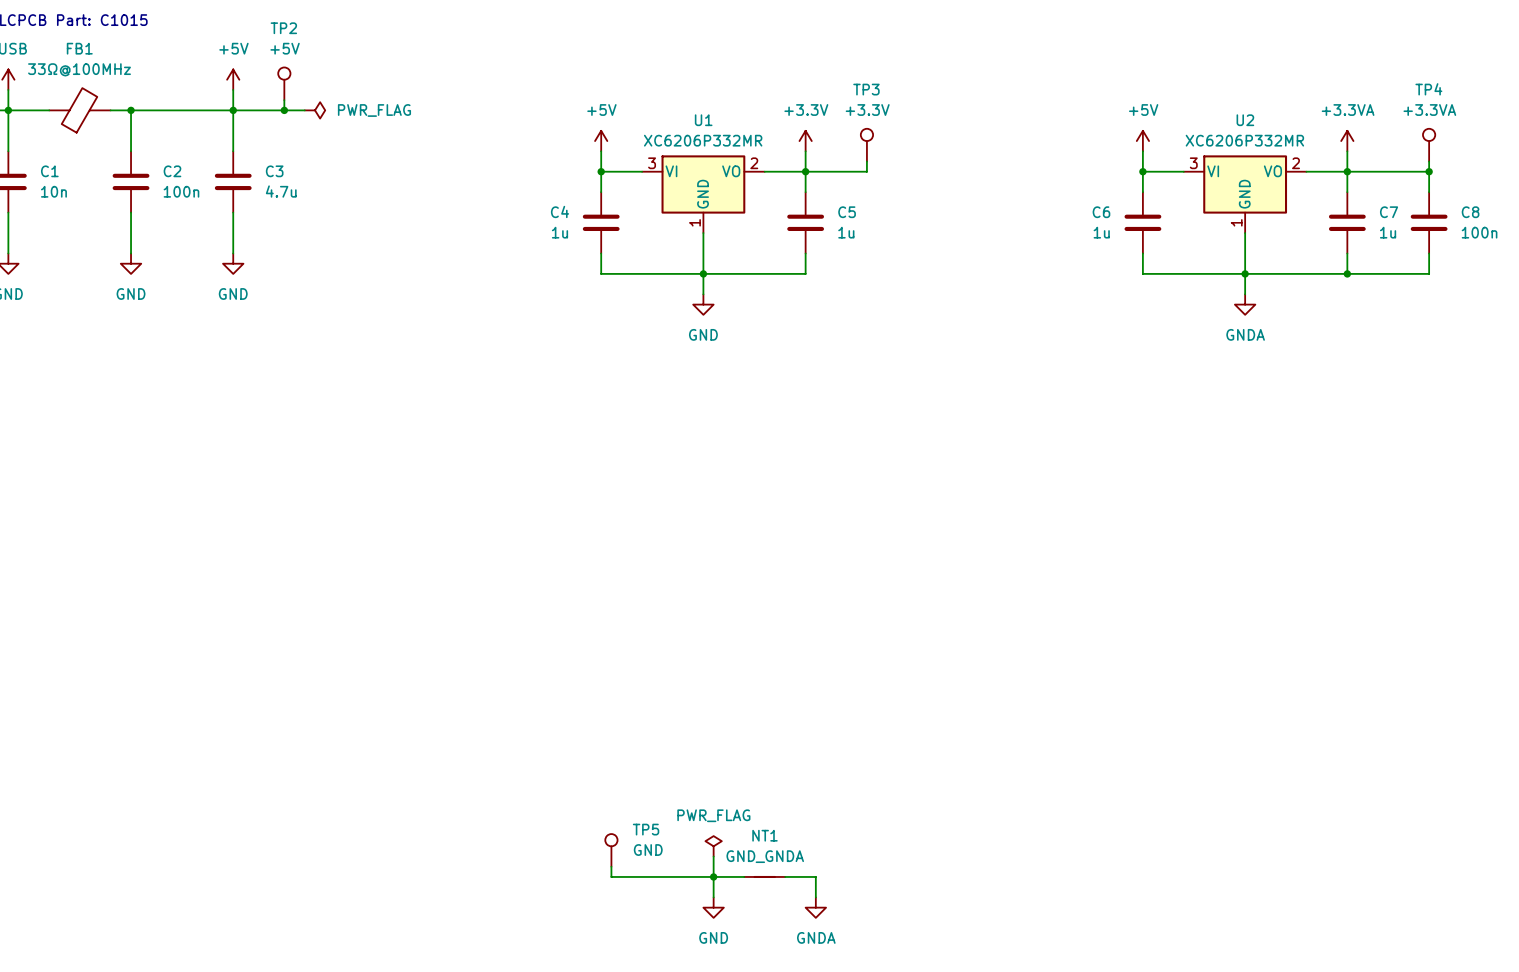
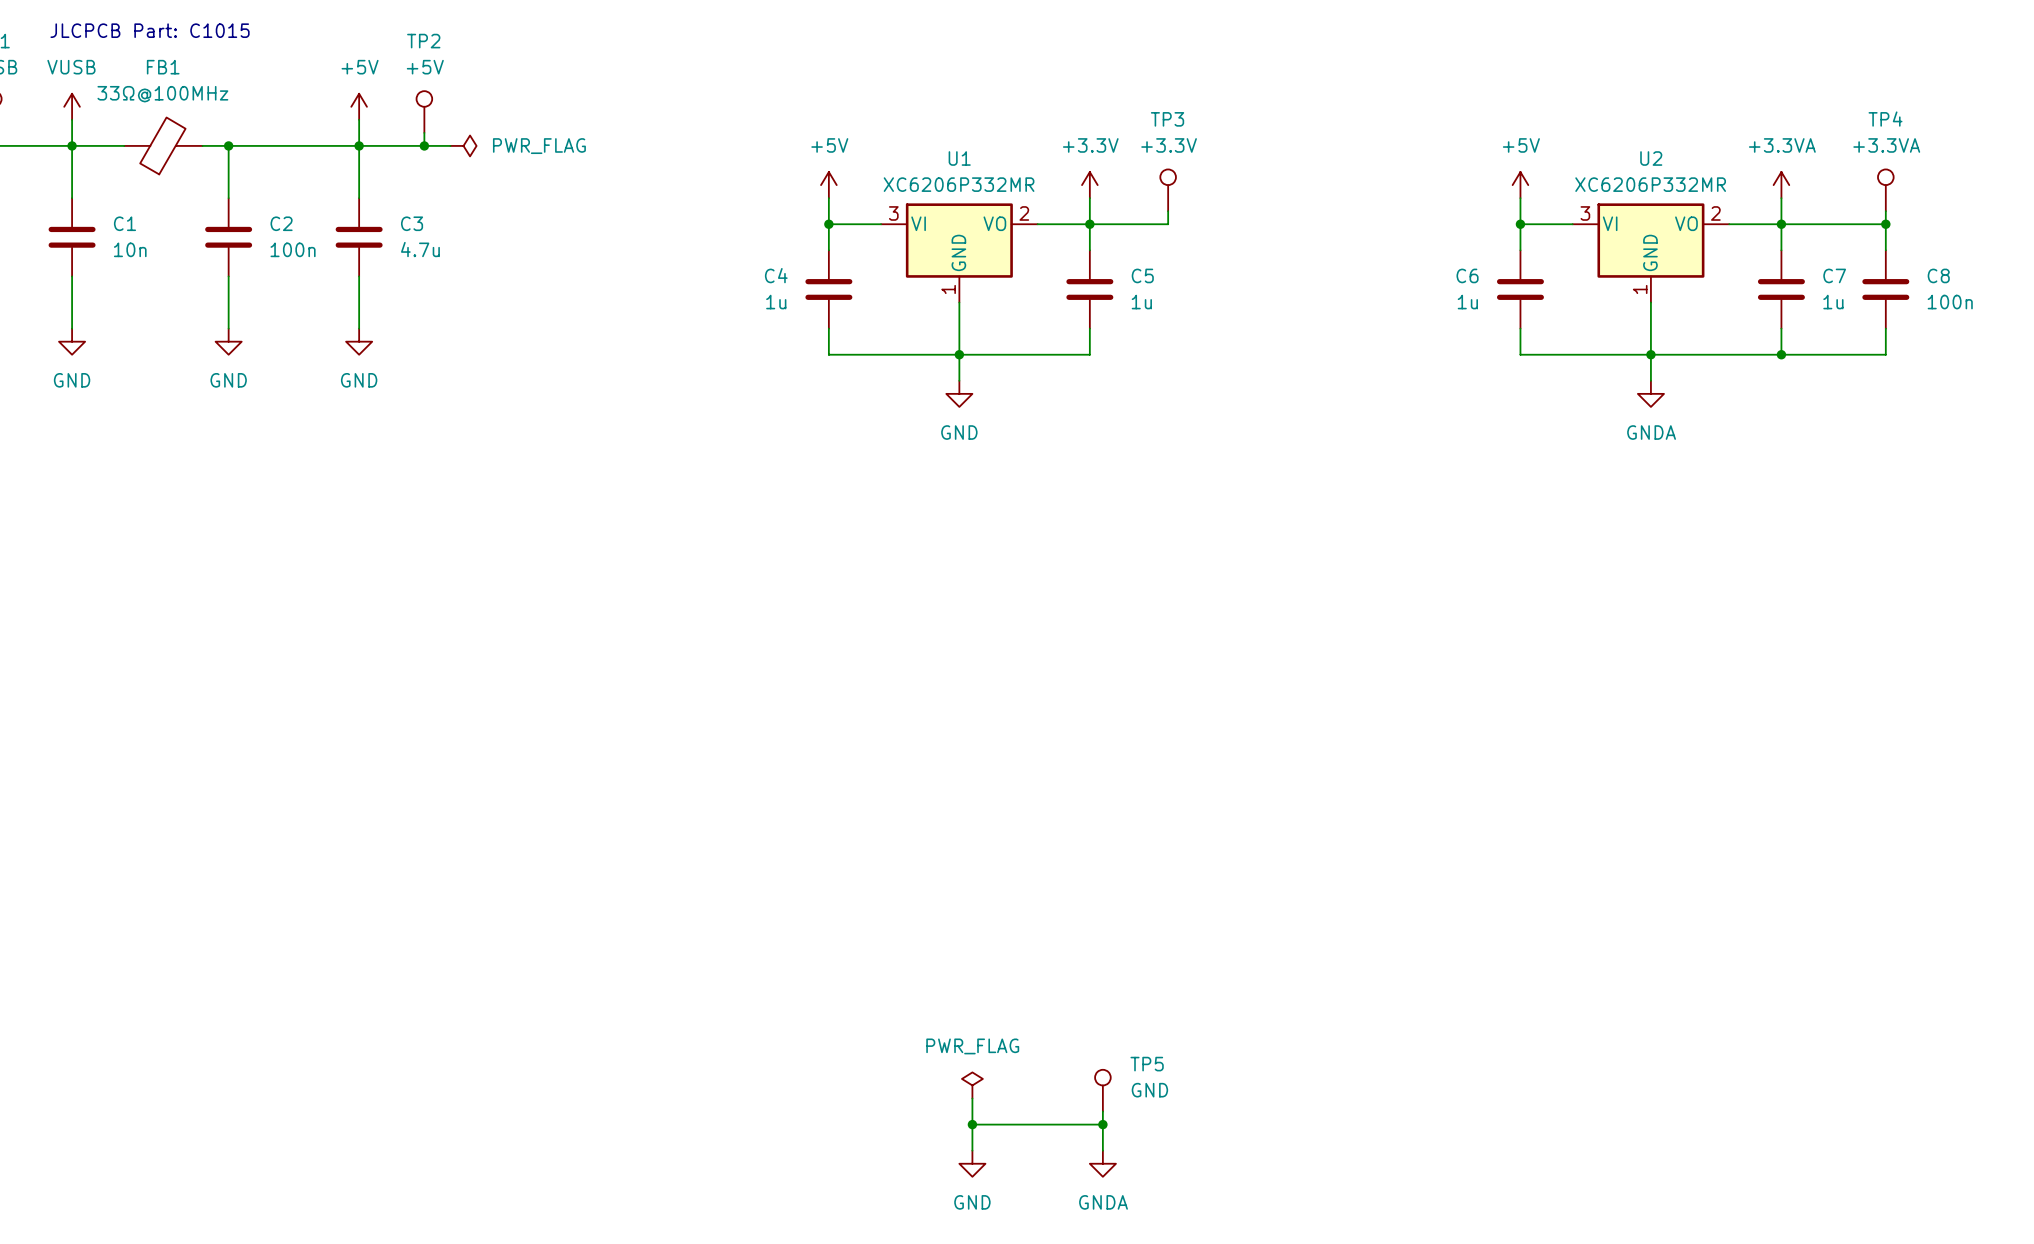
TP5 position: (611, 850) -> (1102, 1090)
wire: (611, 866) (611, 876) (713, 876) -> none
wire: none -> (1102, 1111) (1102, 1124)
NT1: GND_GNDA (764, 876) -> none
junction: none -> (1102, 1124)

